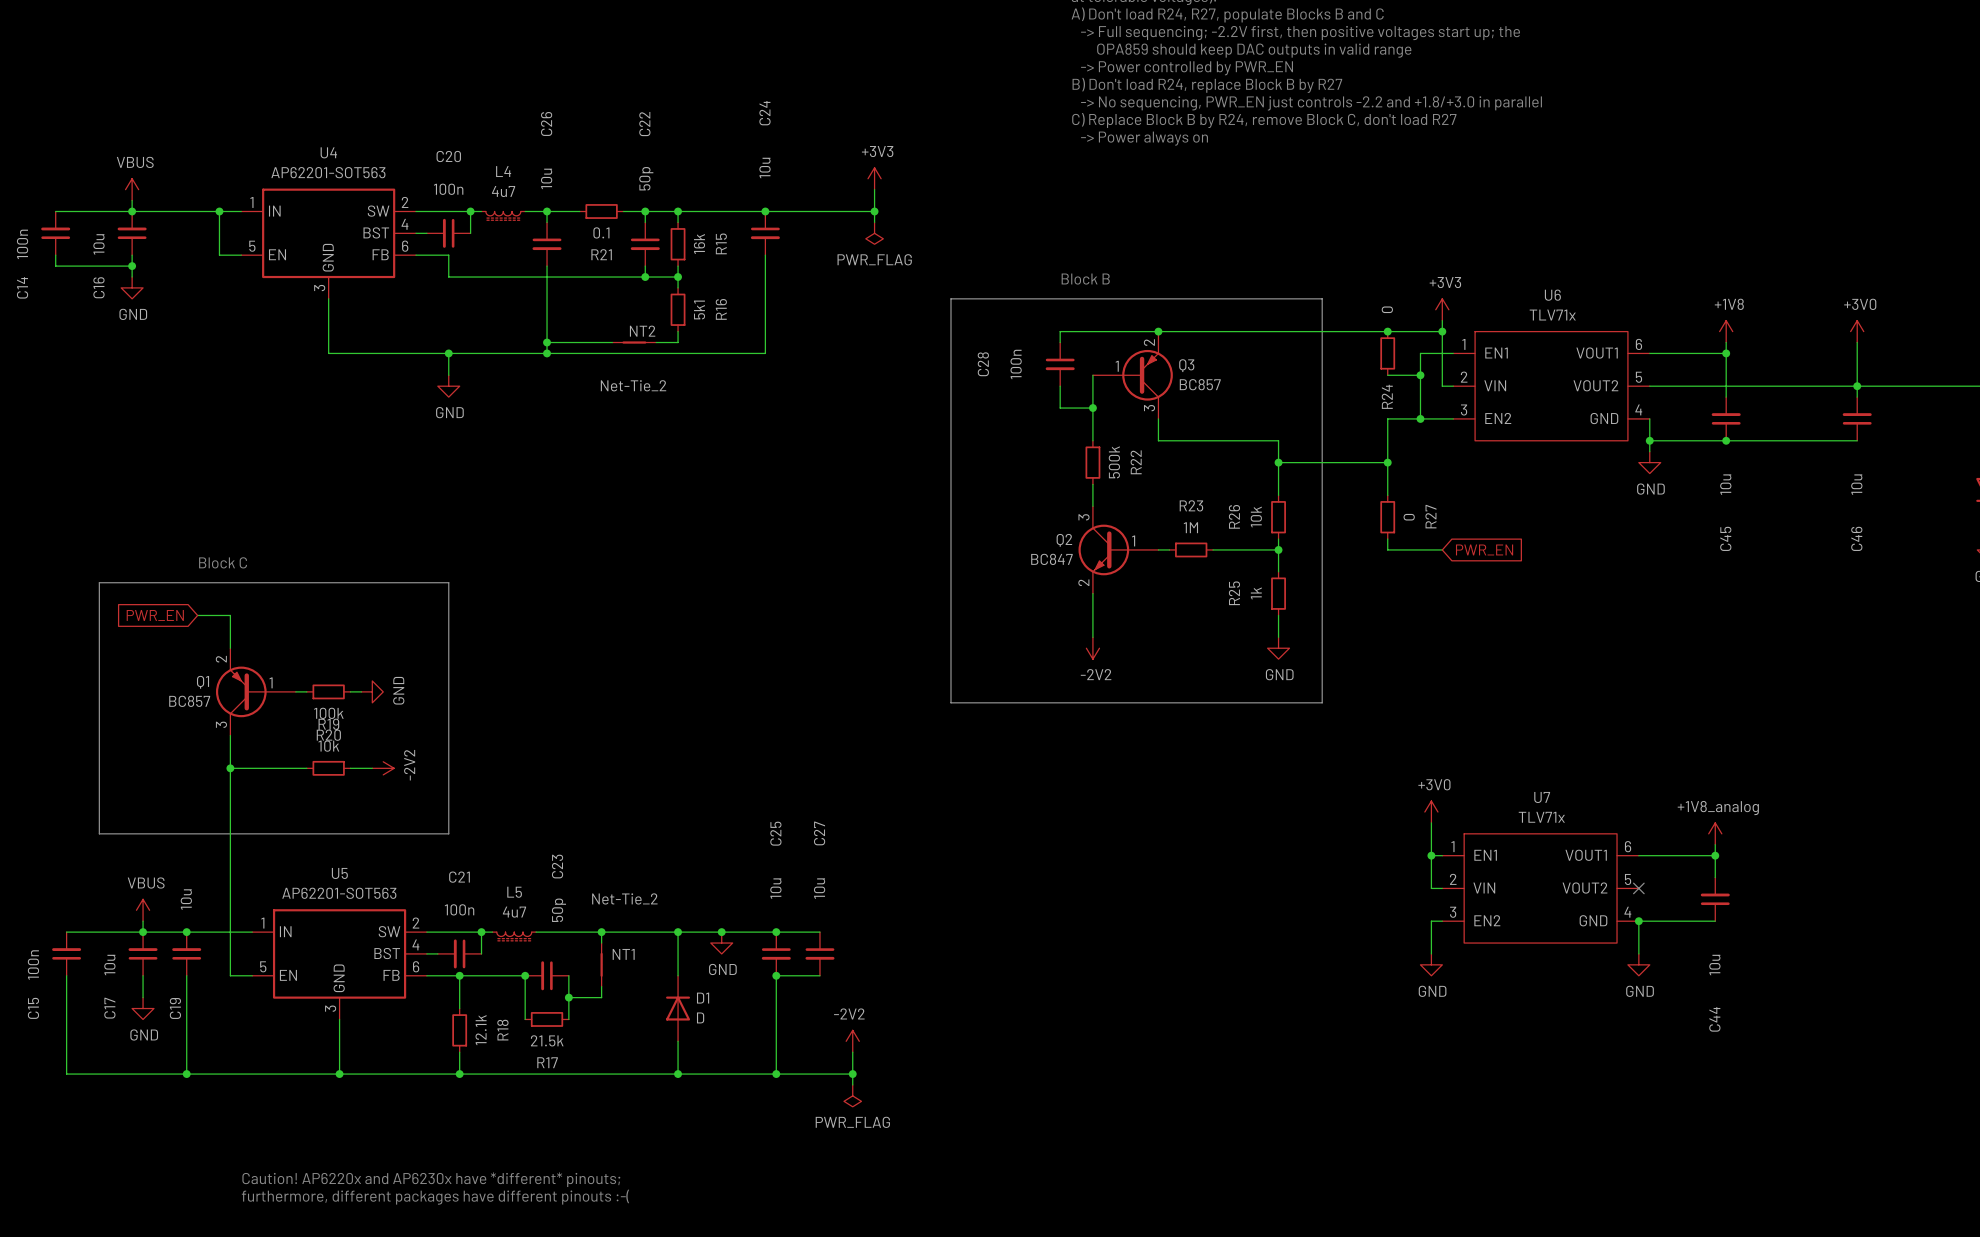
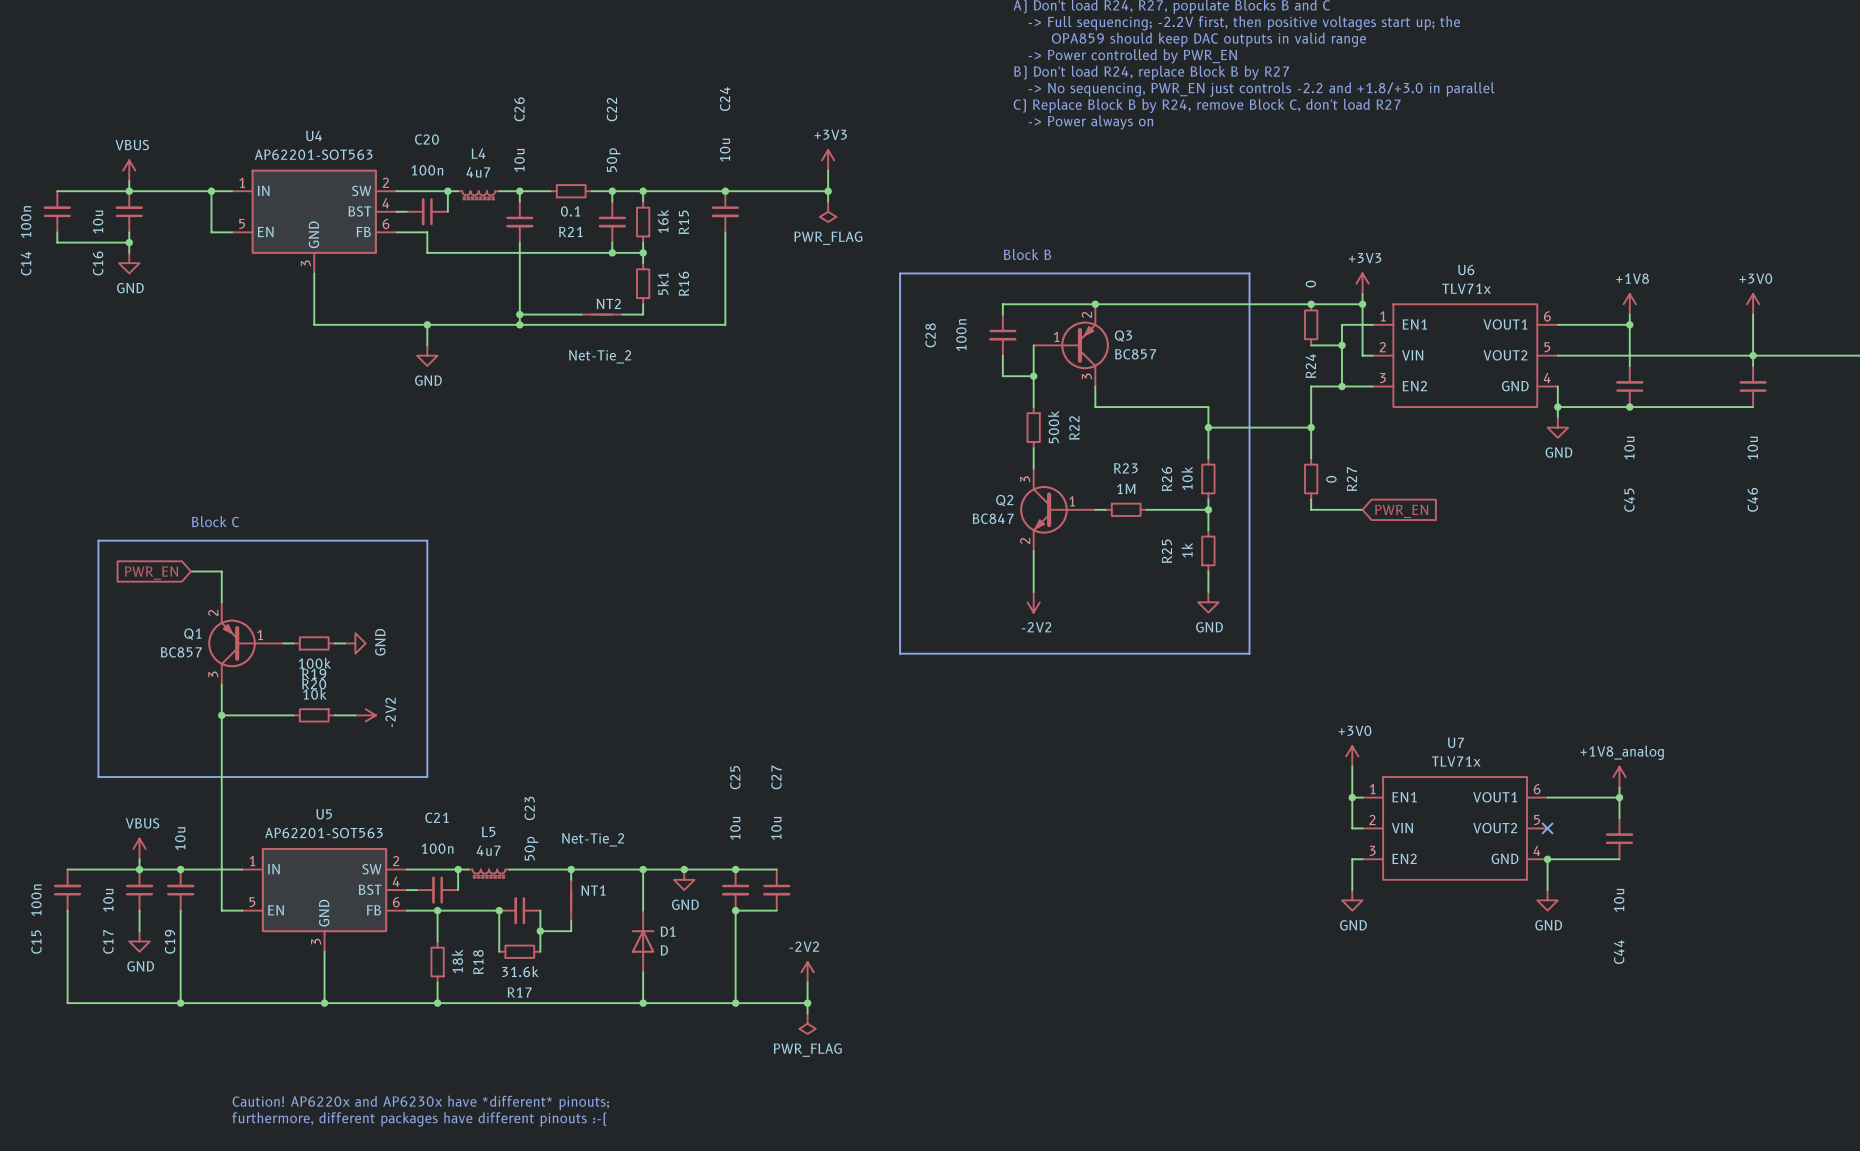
R18 value: 12.1k (481, 1030) -> 18k (457, 961)
R17 value: 21.5k (547, 1040) -> 31.6k (520, 971)

